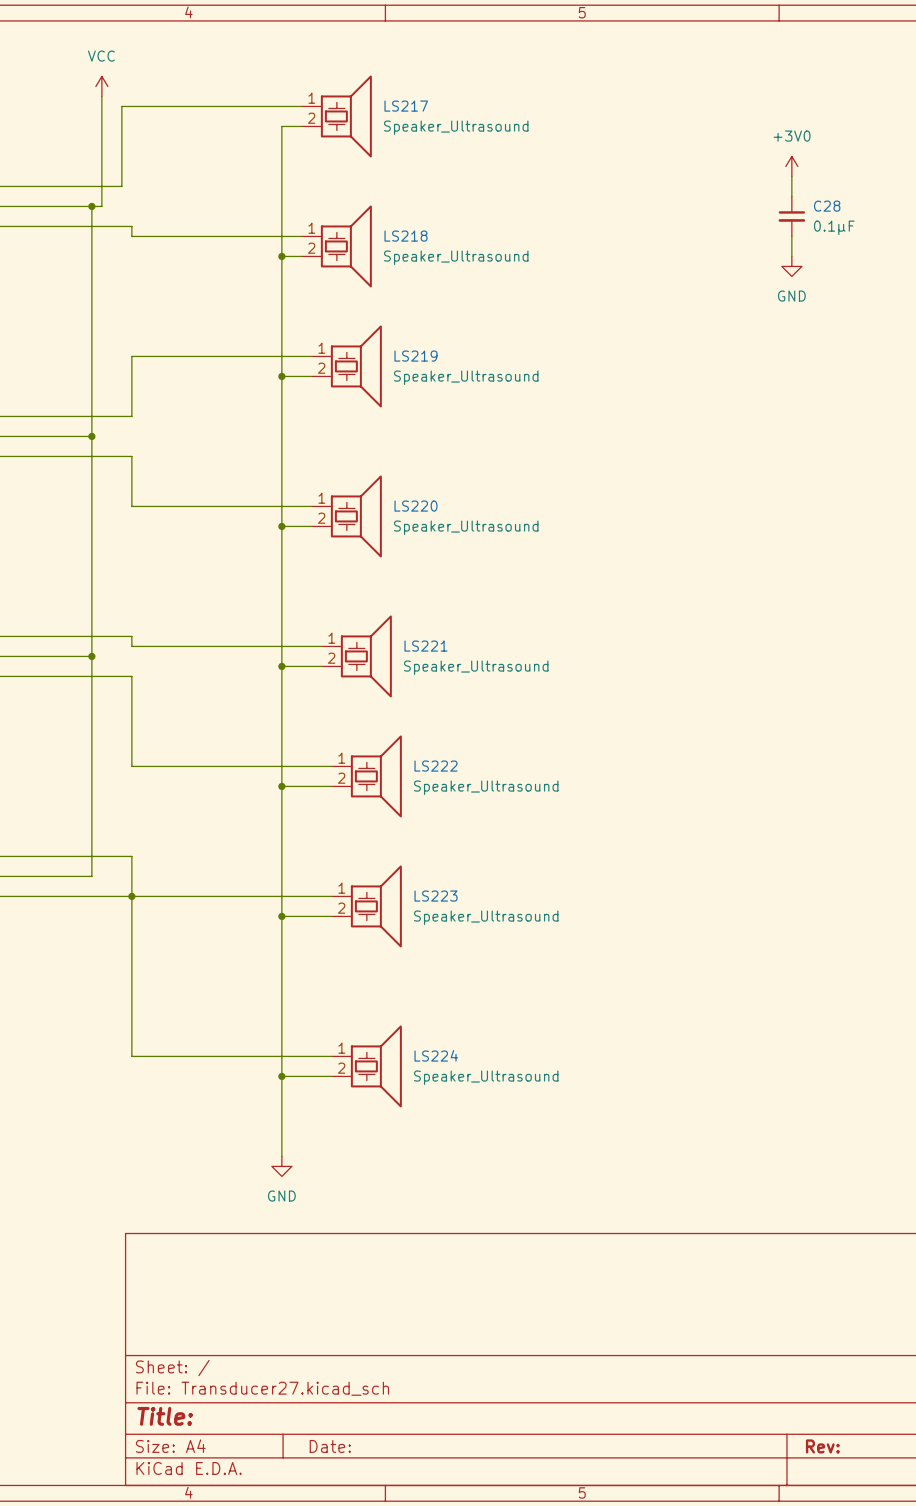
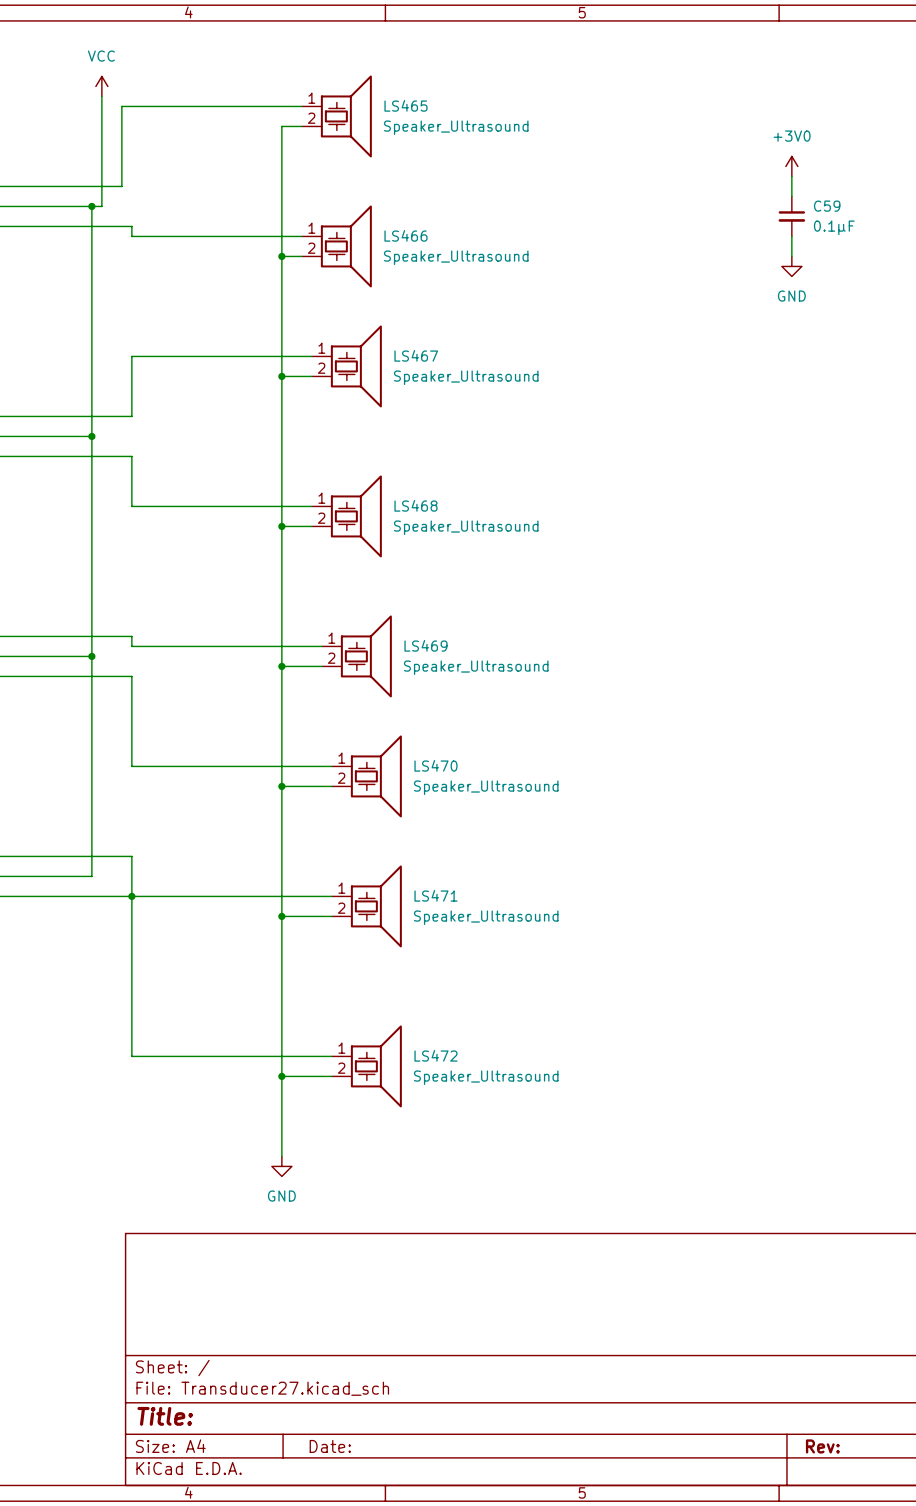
LS217 name: LS217 (406, 106) -> LS465 (405, 105)
C28 name: C28 (827, 206) -> C59 (827, 206)
LS218 name: LS218 (405, 236) -> LS466 (405, 235)
LS219 name: LS219 (415, 356) -> LS467 (416, 355)
LS220 name: LS220 (415, 506) -> LS468 (415, 505)
LS221 name: LS221 (425, 646) -> LS469 (425, 645)
LS222 name: LS222 (435, 766) -> LS470 (435, 765)
LS223 name: LS223 (435, 896) -> LS471 (435, 895)
LS224 name: LS224 (436, 1055) -> LS472 (435, 1055)

